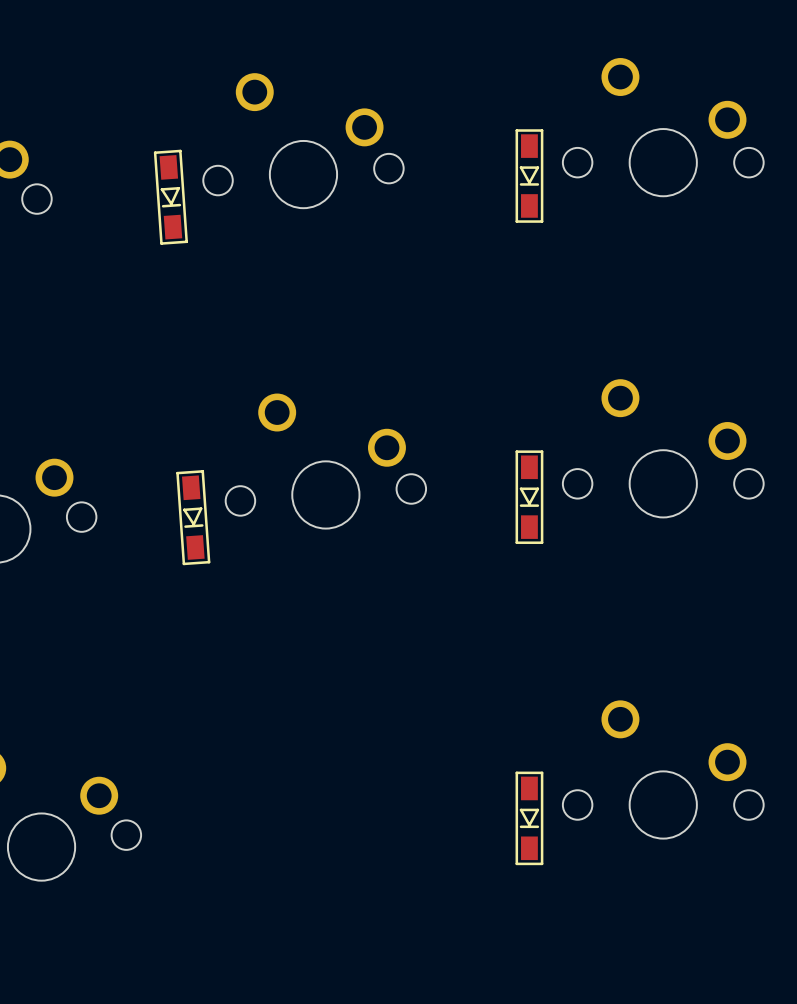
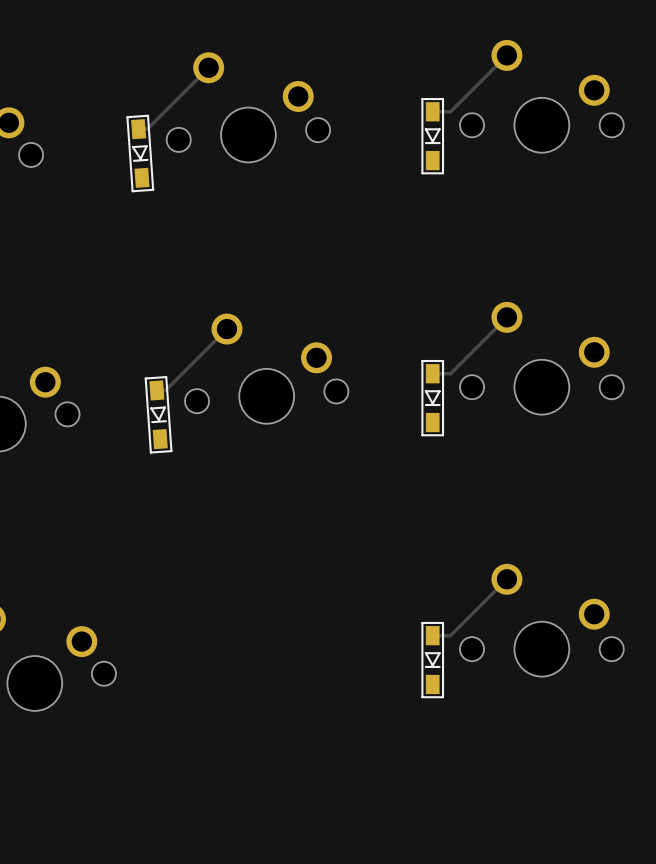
track: none -> (506, 55) (450, 111) (432, 111)
track: none -> (208, 67) (147, 129) (138, 129)
track: none -> (506, 317) (450, 373) (432, 373)
track: none -> (226, 329) (165, 390) (156, 390)
track: none -> (506, 579) (450, 635) (432, 635)

